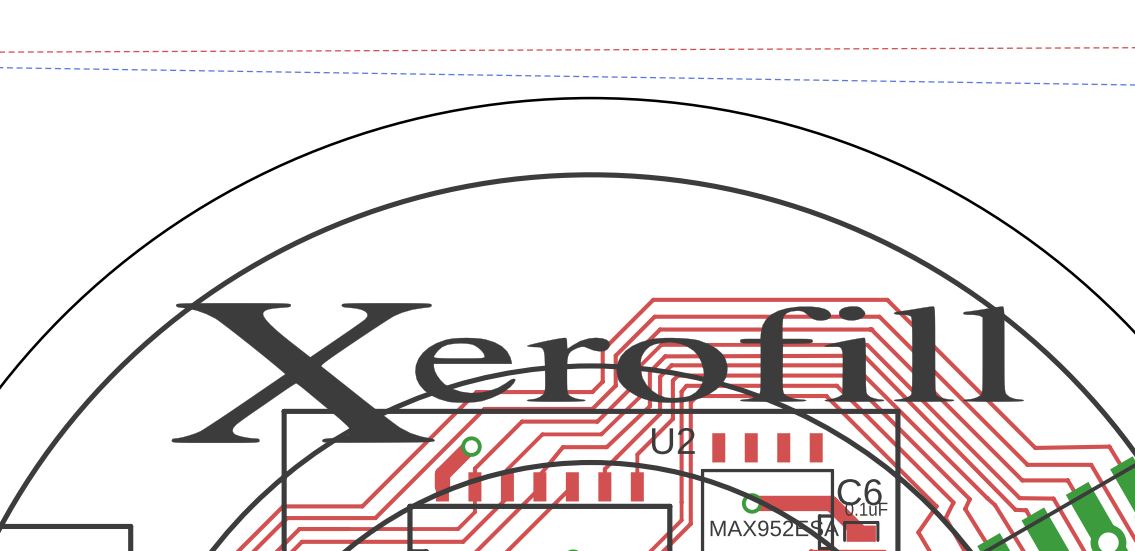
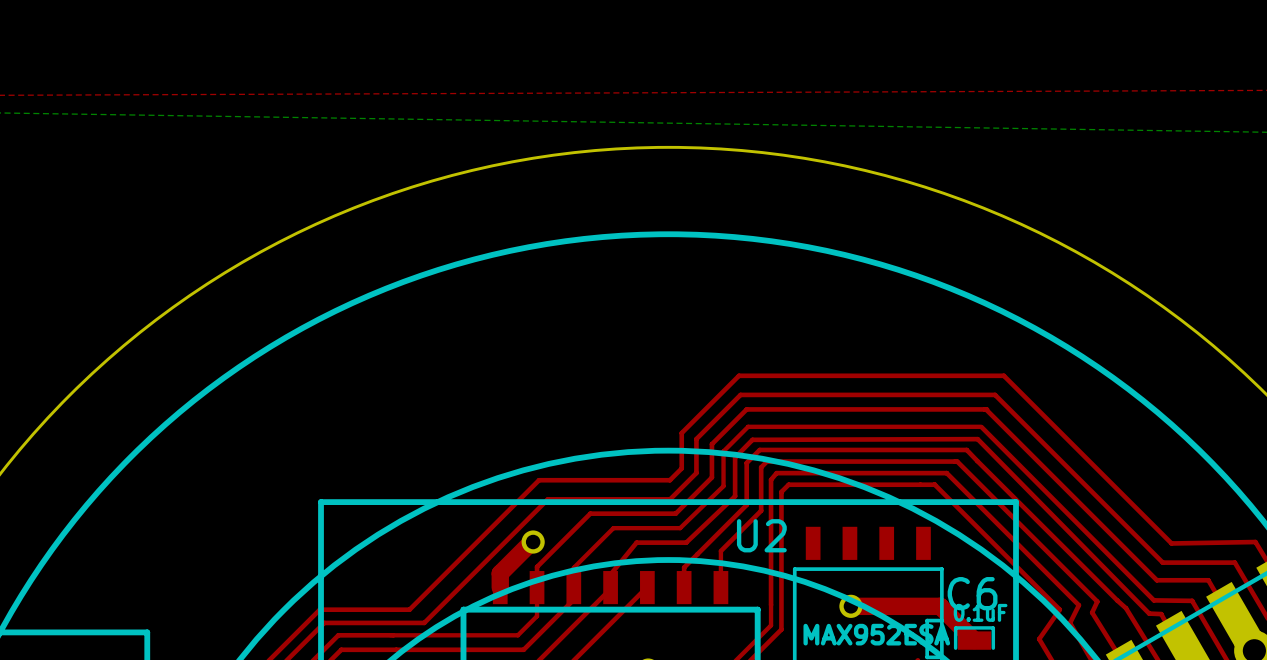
drawing: [171, 303, 1024, 444] -> none

